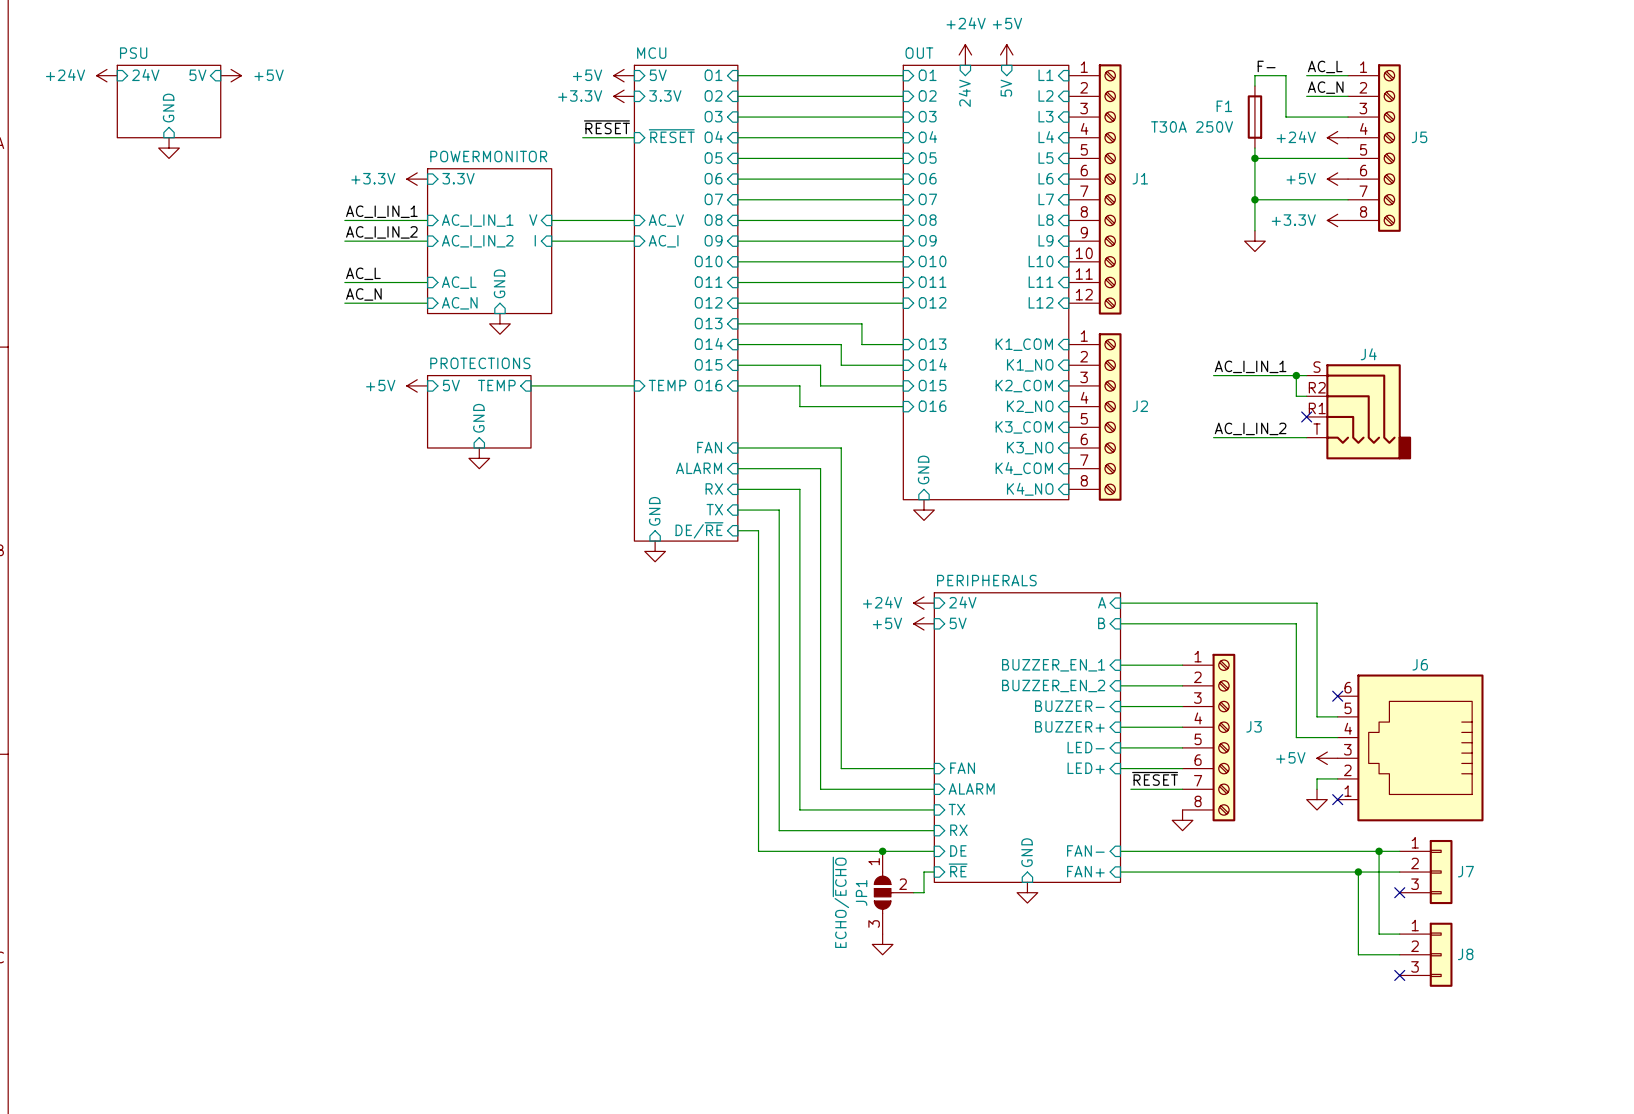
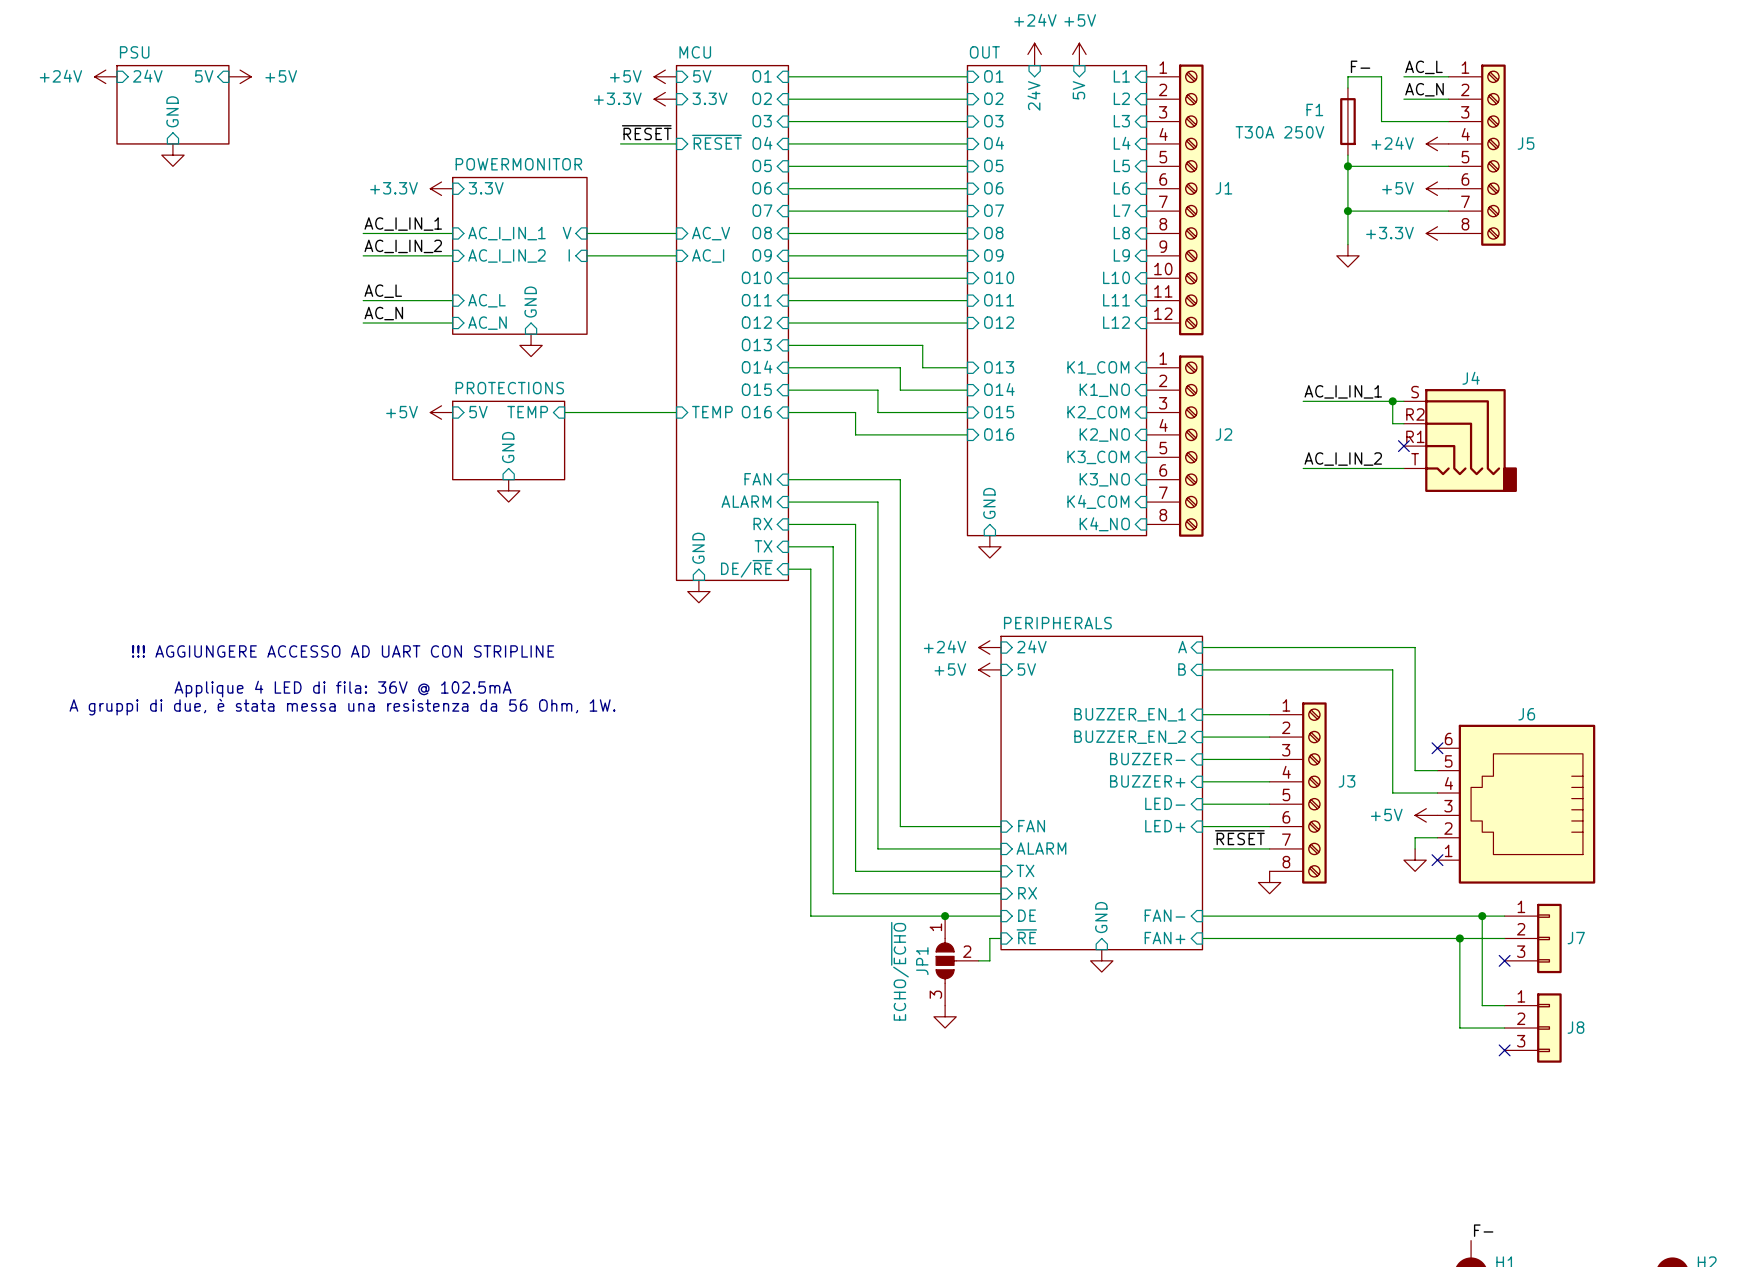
text: none -> !!! AGGIUNGERE ACCESSO AD UART CON STRIPLINE (343, 651)
text: none -> Applique 4 LED di fila: 36V @ 102.5mA (343, 689)
text: none -> A gruppi di due, è stata messa una resistenza da 56 Ohm, 1W. (342, 707)

